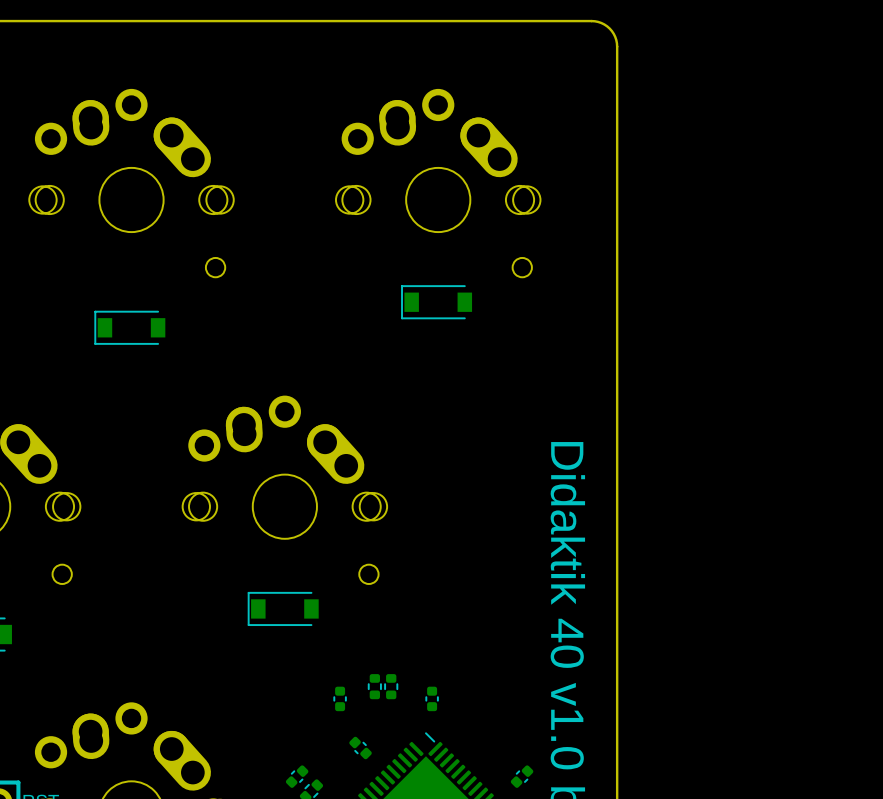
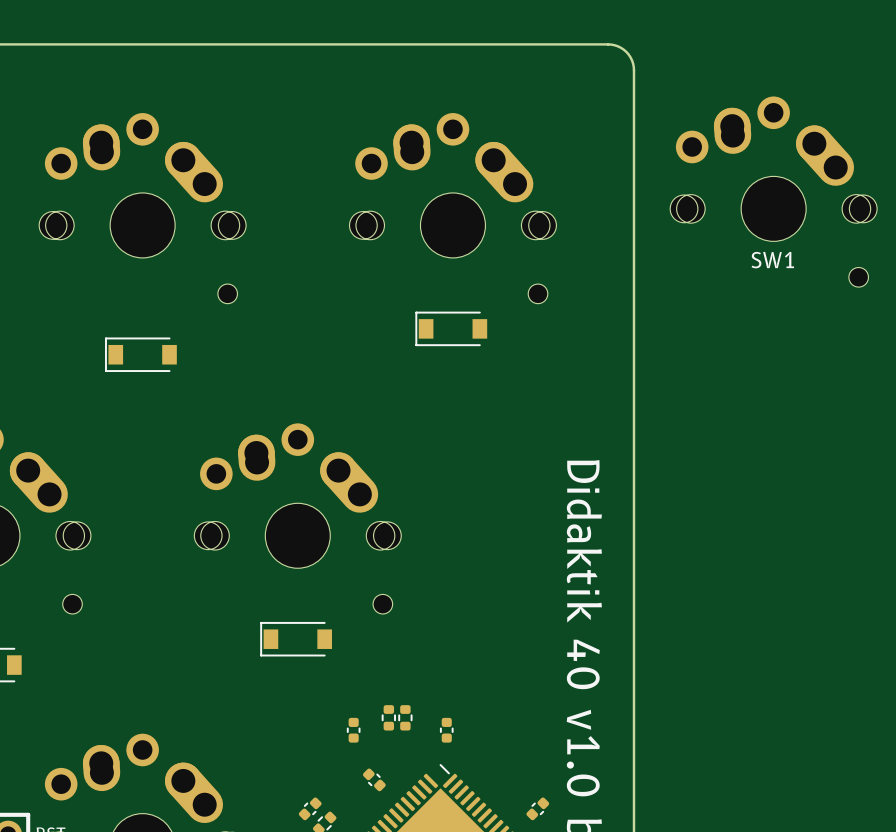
SW1: none -> (773, 191)

